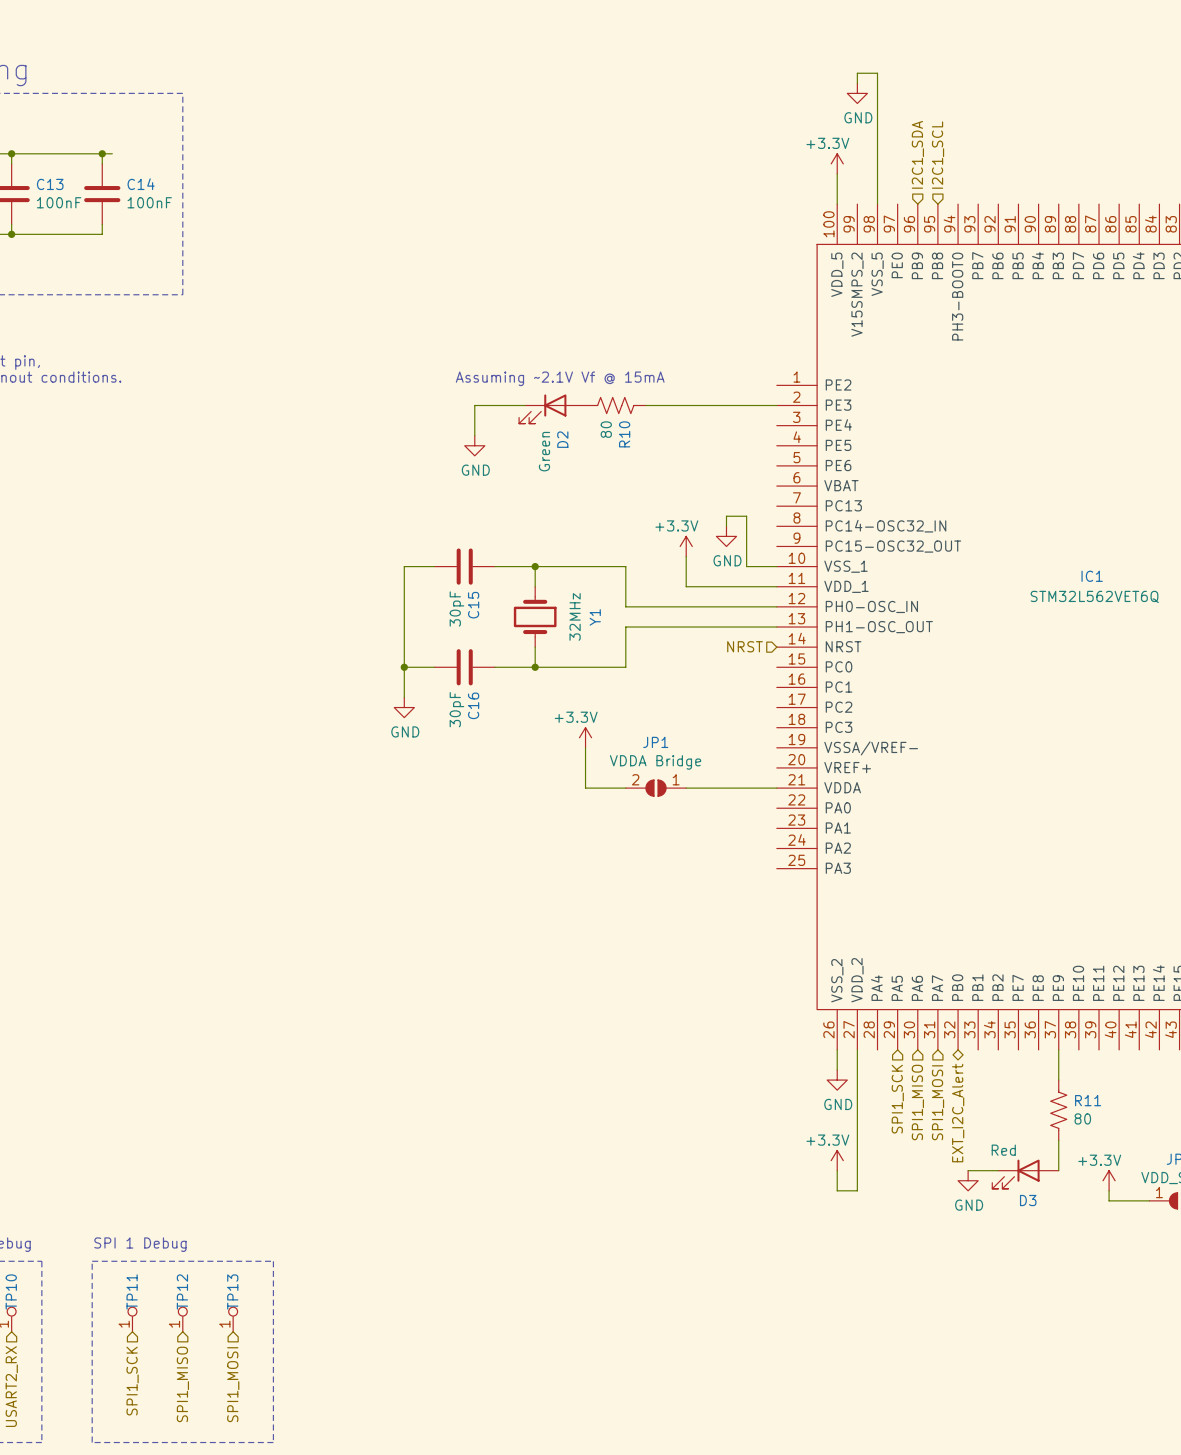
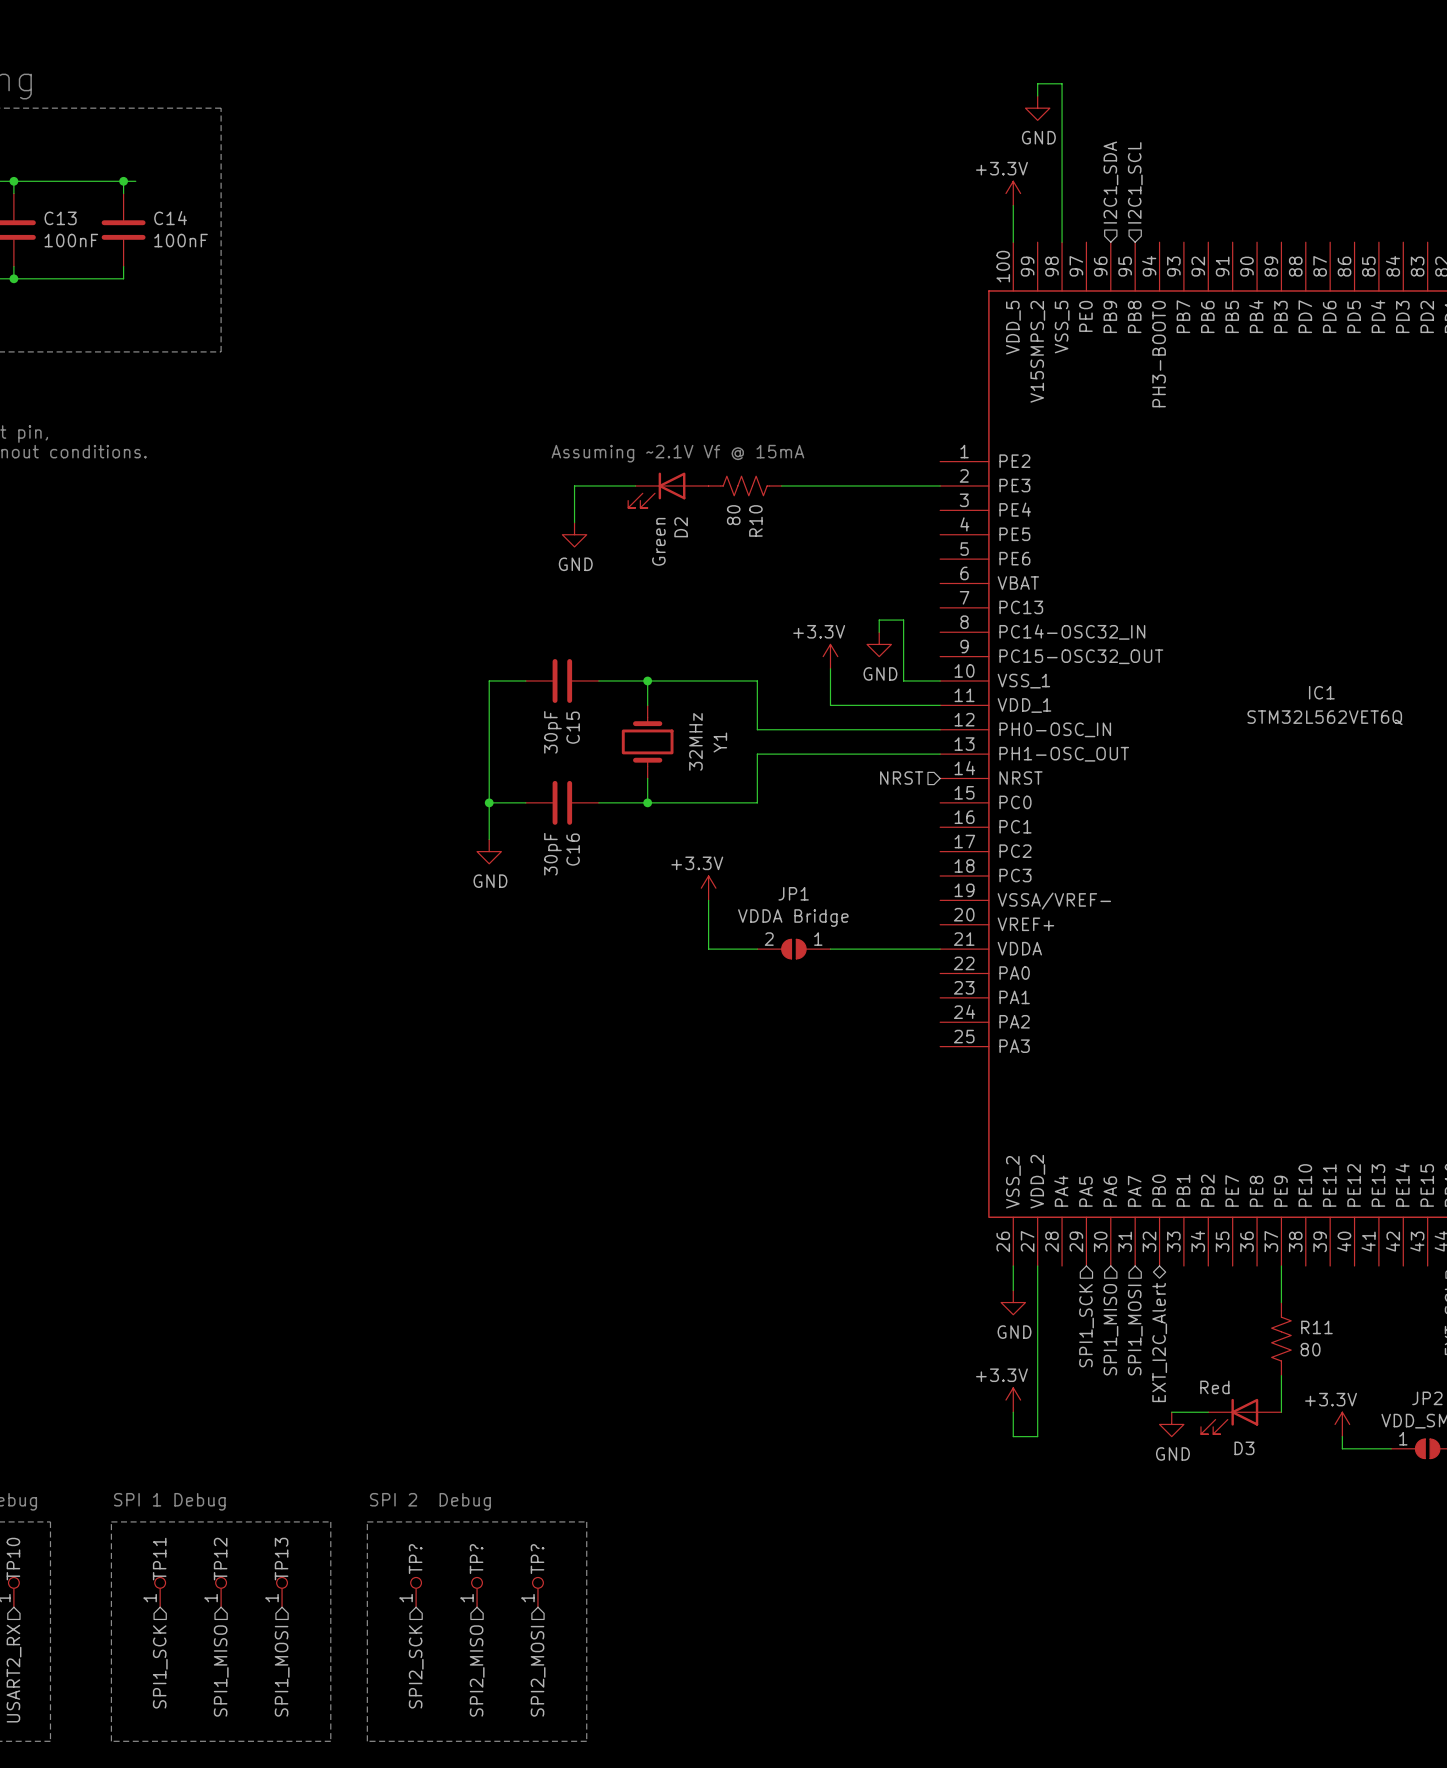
text: none -> SPI 2 Debug (430, 1501)
line: none -> (367, 1521) (586, 1521) (586, 1741) (367, 1741) (367, 1521)
TP?: none -> (416, 1592)
TP?: none -> (477, 1592)
TP?: none -> (537, 1592)
hierarchical label: none -> SPI2_SCK (416, 1666)
hierarchical label: none -> SPI2_MISO (477, 1670)
hierarchical label: none -> SPI2_MOSI (538, 1671)

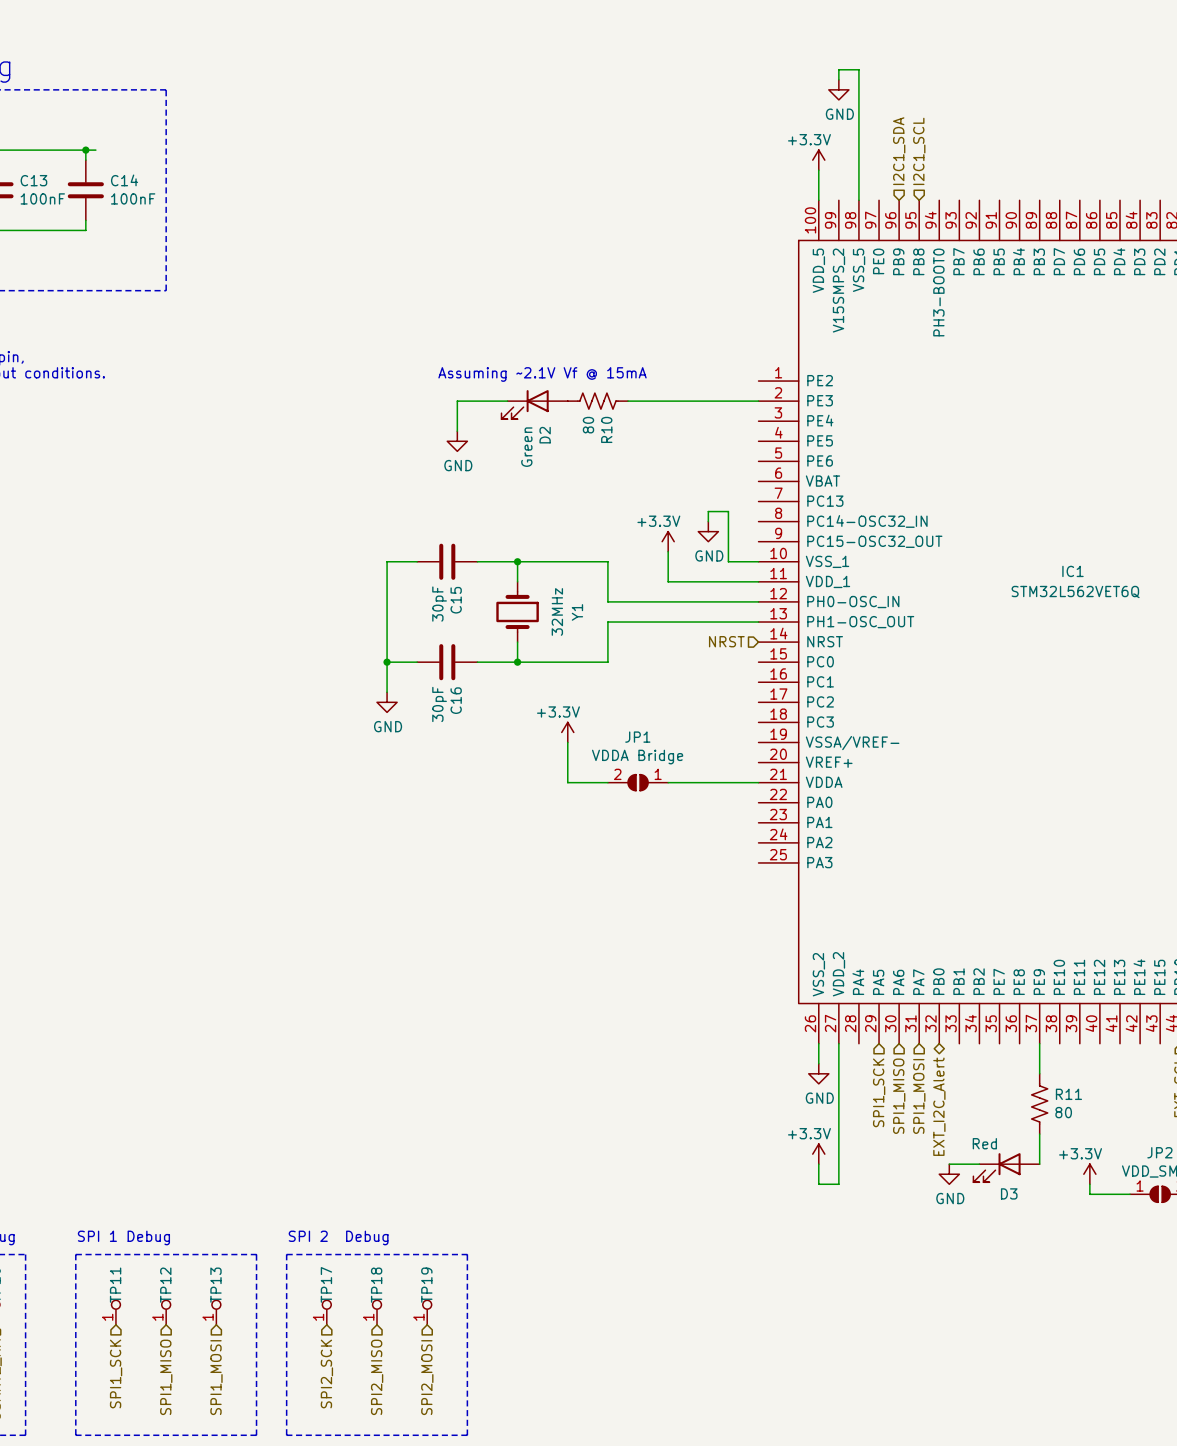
TP? name: TP? (415, 1559) -> TP17 (326, 1284)
TP? name: TP? (476, 1559) -> TP18 (376, 1285)
TP? name: TP? (537, 1559) -> TP19 (426, 1285)

